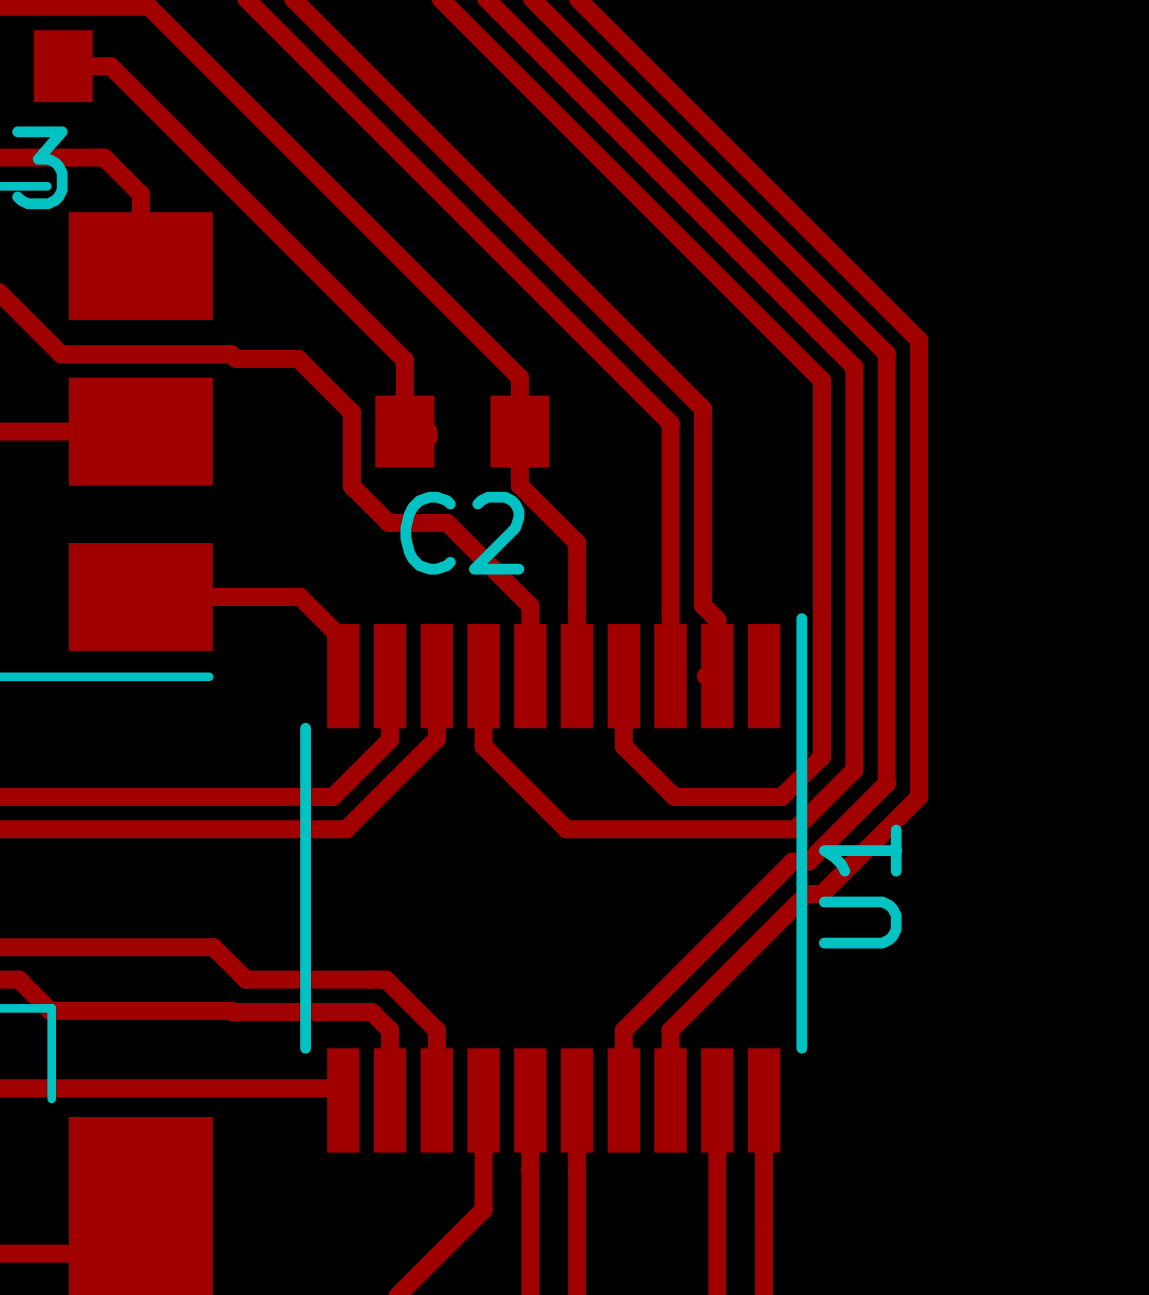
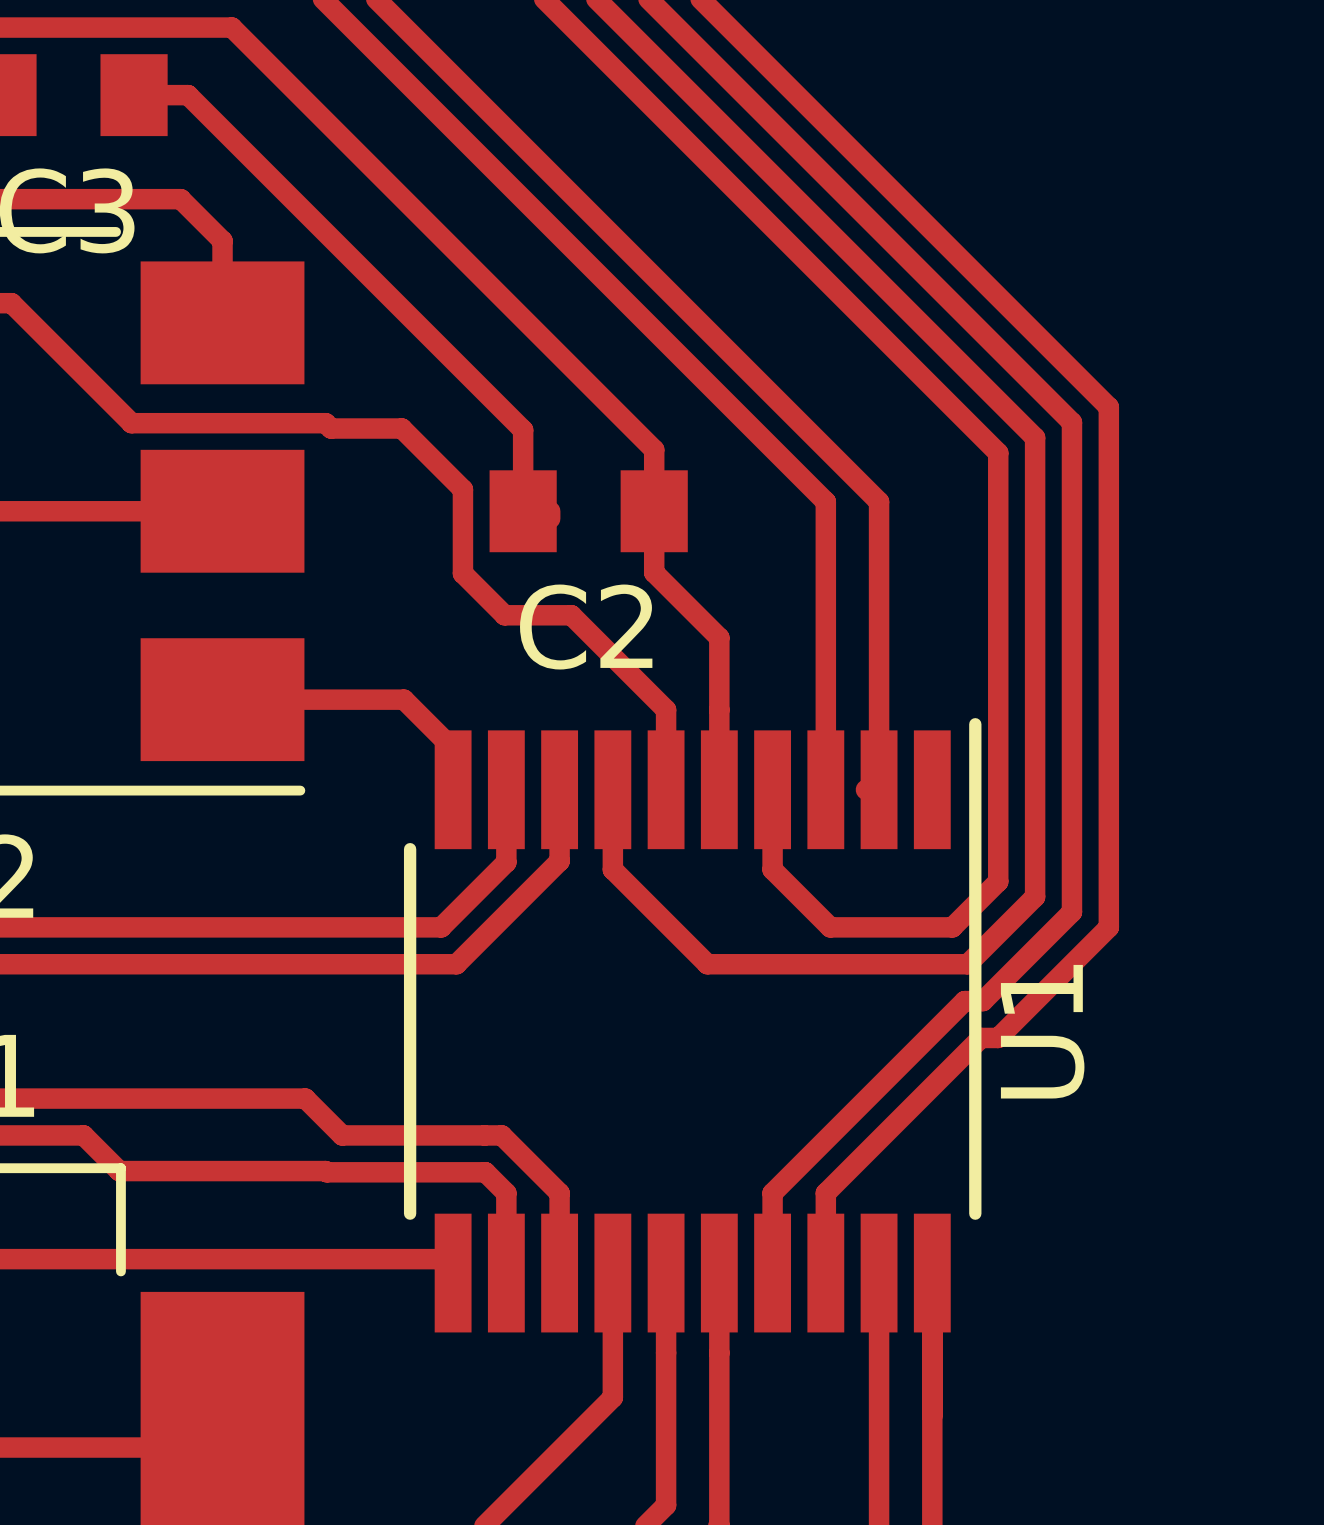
top track: (702, 408) (702, 605) (717, 619) -> (862, 485) (879, 501) (879, 725)

